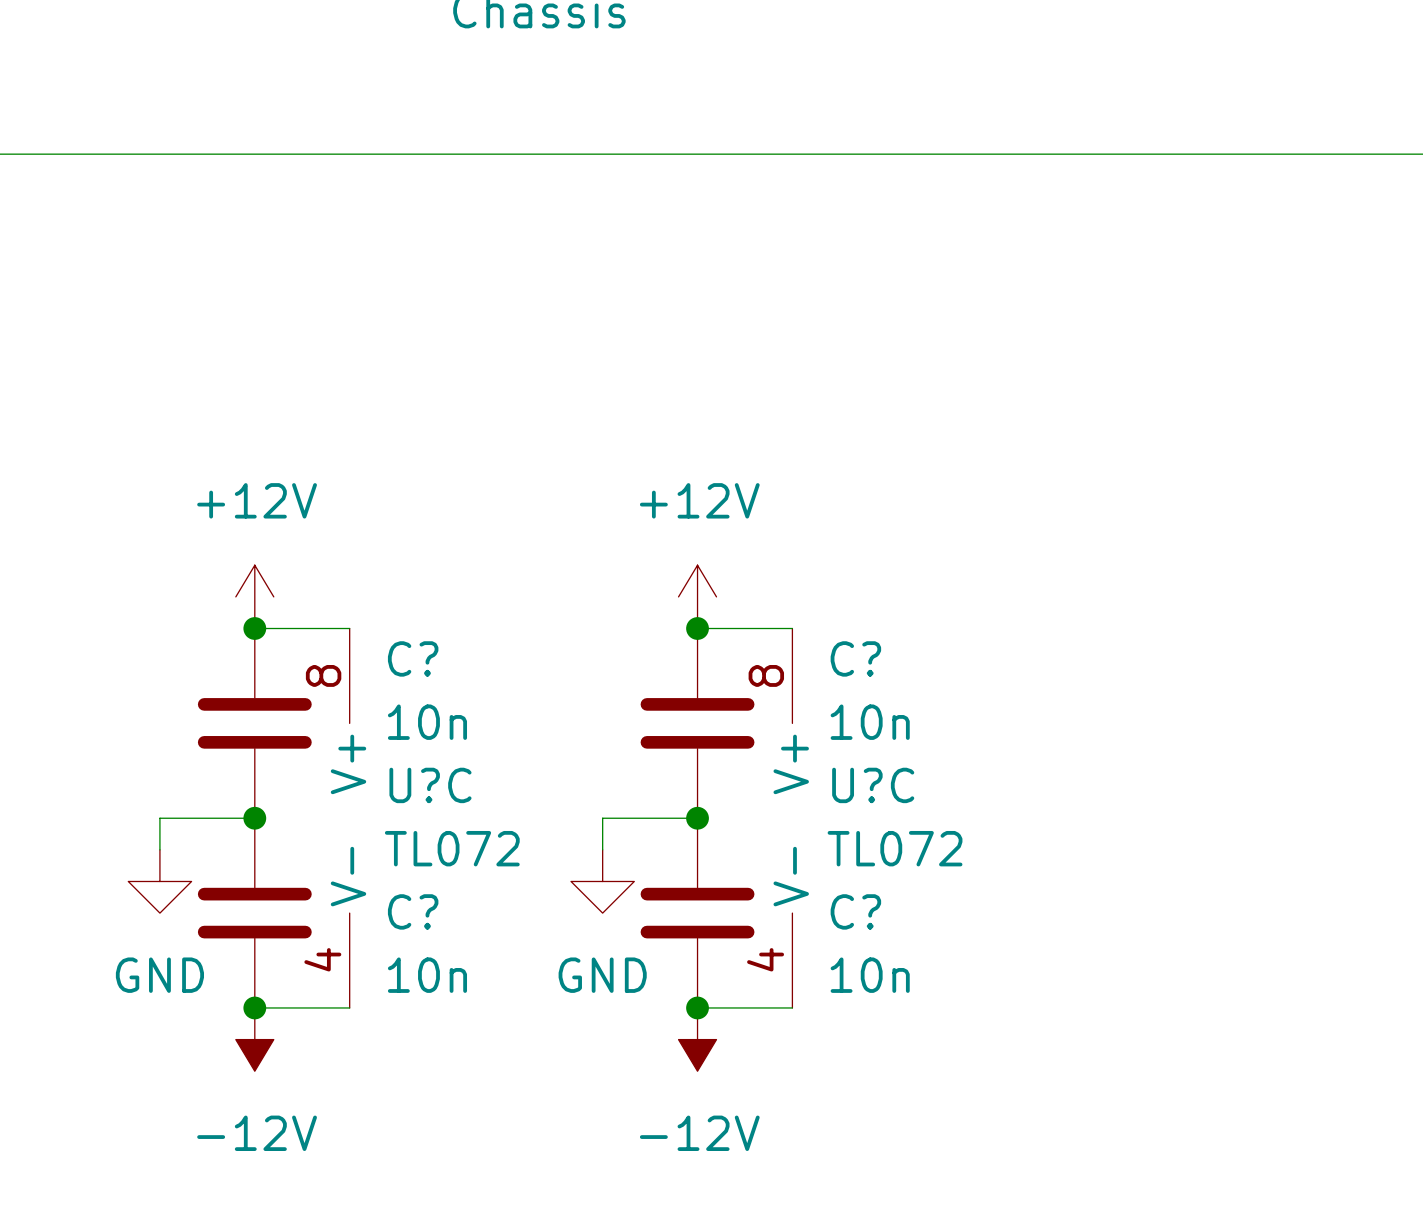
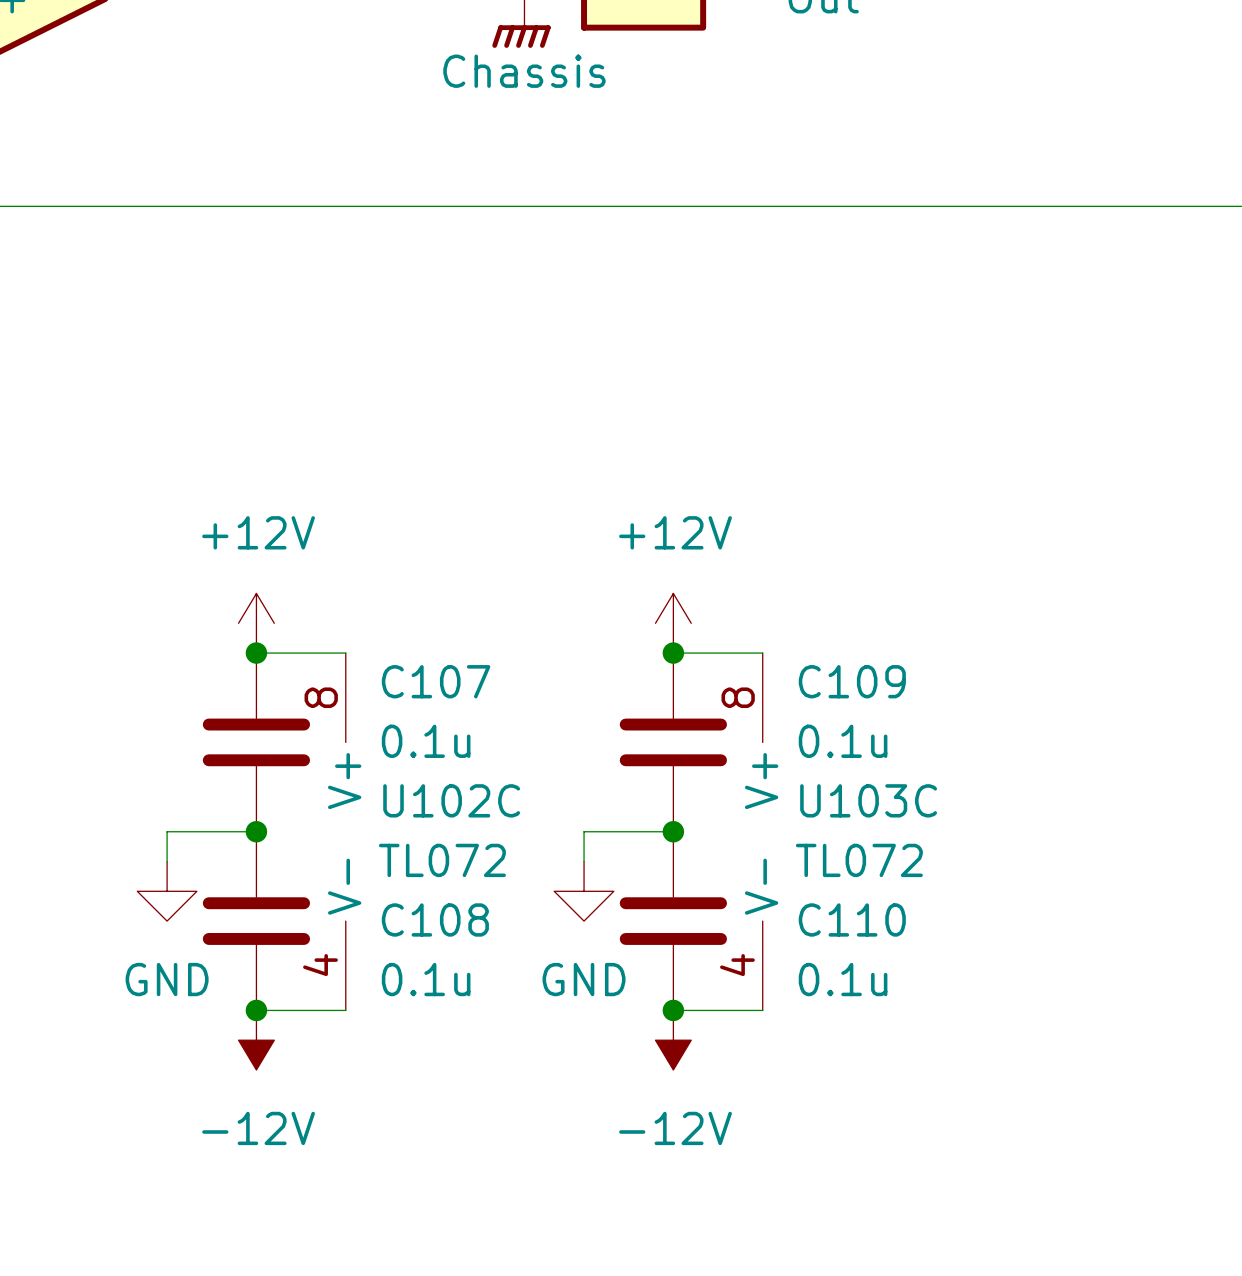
C? name: C? (413, 658) -> C107 (436, 681)
C? name: C? (855, 658) -> C109 (852, 681)
C? value: 10n (427, 722) -> 0.1u (426, 741)
C? value: 10n (870, 722) -> 0.1u (843, 741)
U?C name: U?C (430, 785) -> U102C (451, 800)
U?C name: U?C (873, 785) -> U103C (868, 800)
C? name: C? (413, 911) -> C108 (435, 919)
C? name: C? (855, 911) -> C110 (852, 919)
C? value: 10n (427, 975) -> 0.1u (426, 979)
C? value: 10n (870, 975) -> 0.1u (843, 979)

